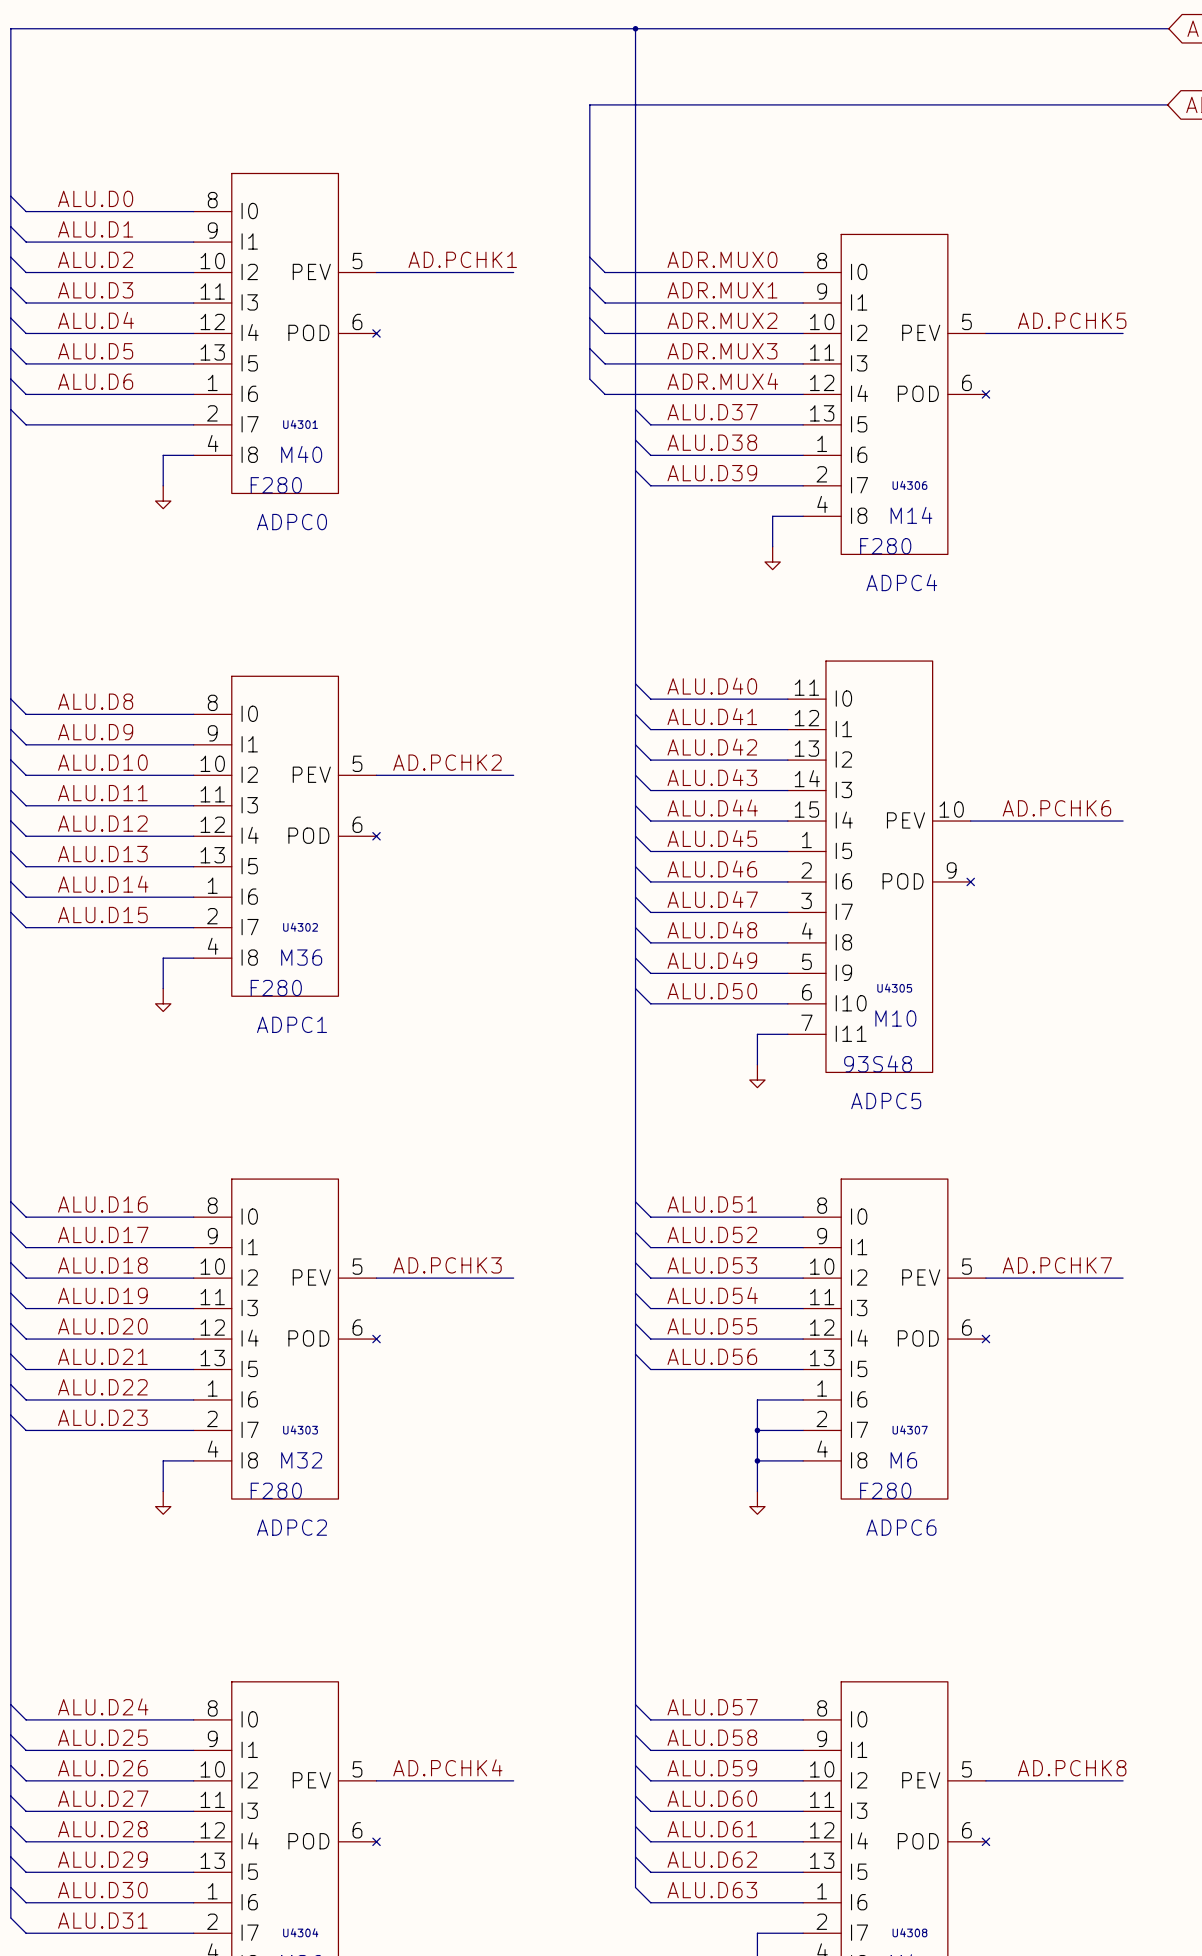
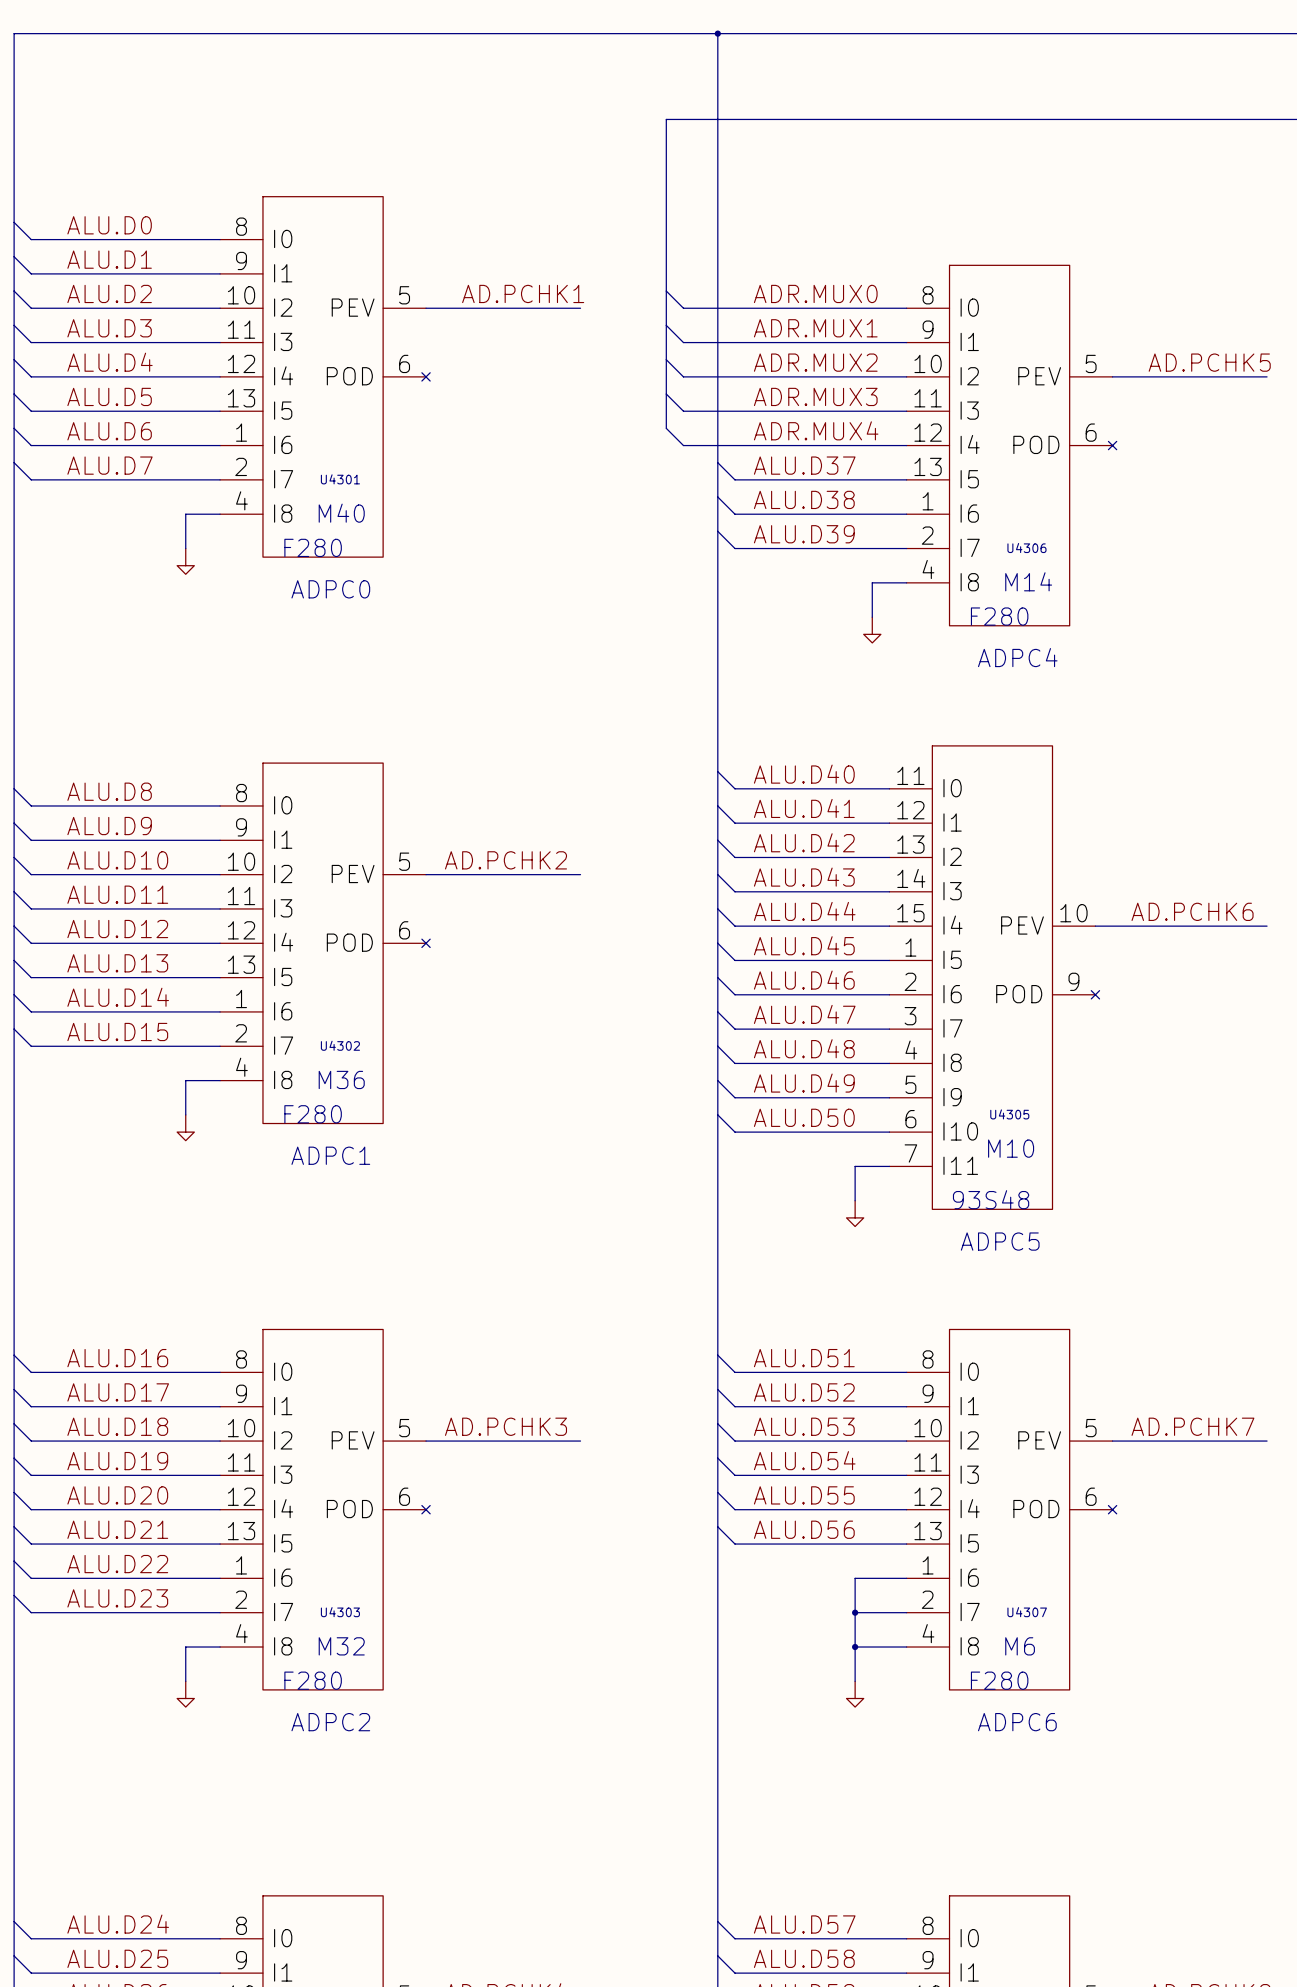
label: none -> ALU.D7 (110, 465)

